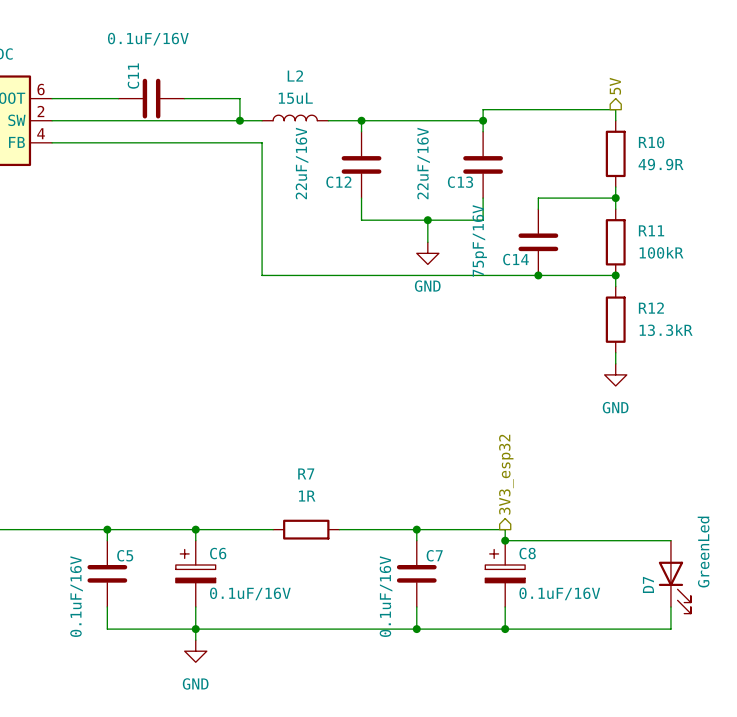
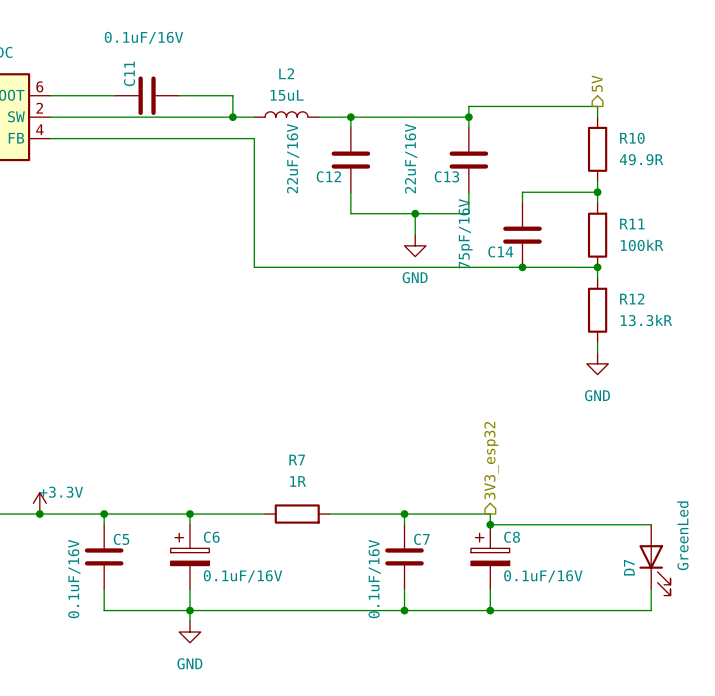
power symbol: none -> +3.3V (39, 503)
junction: none -> (39, 514)

